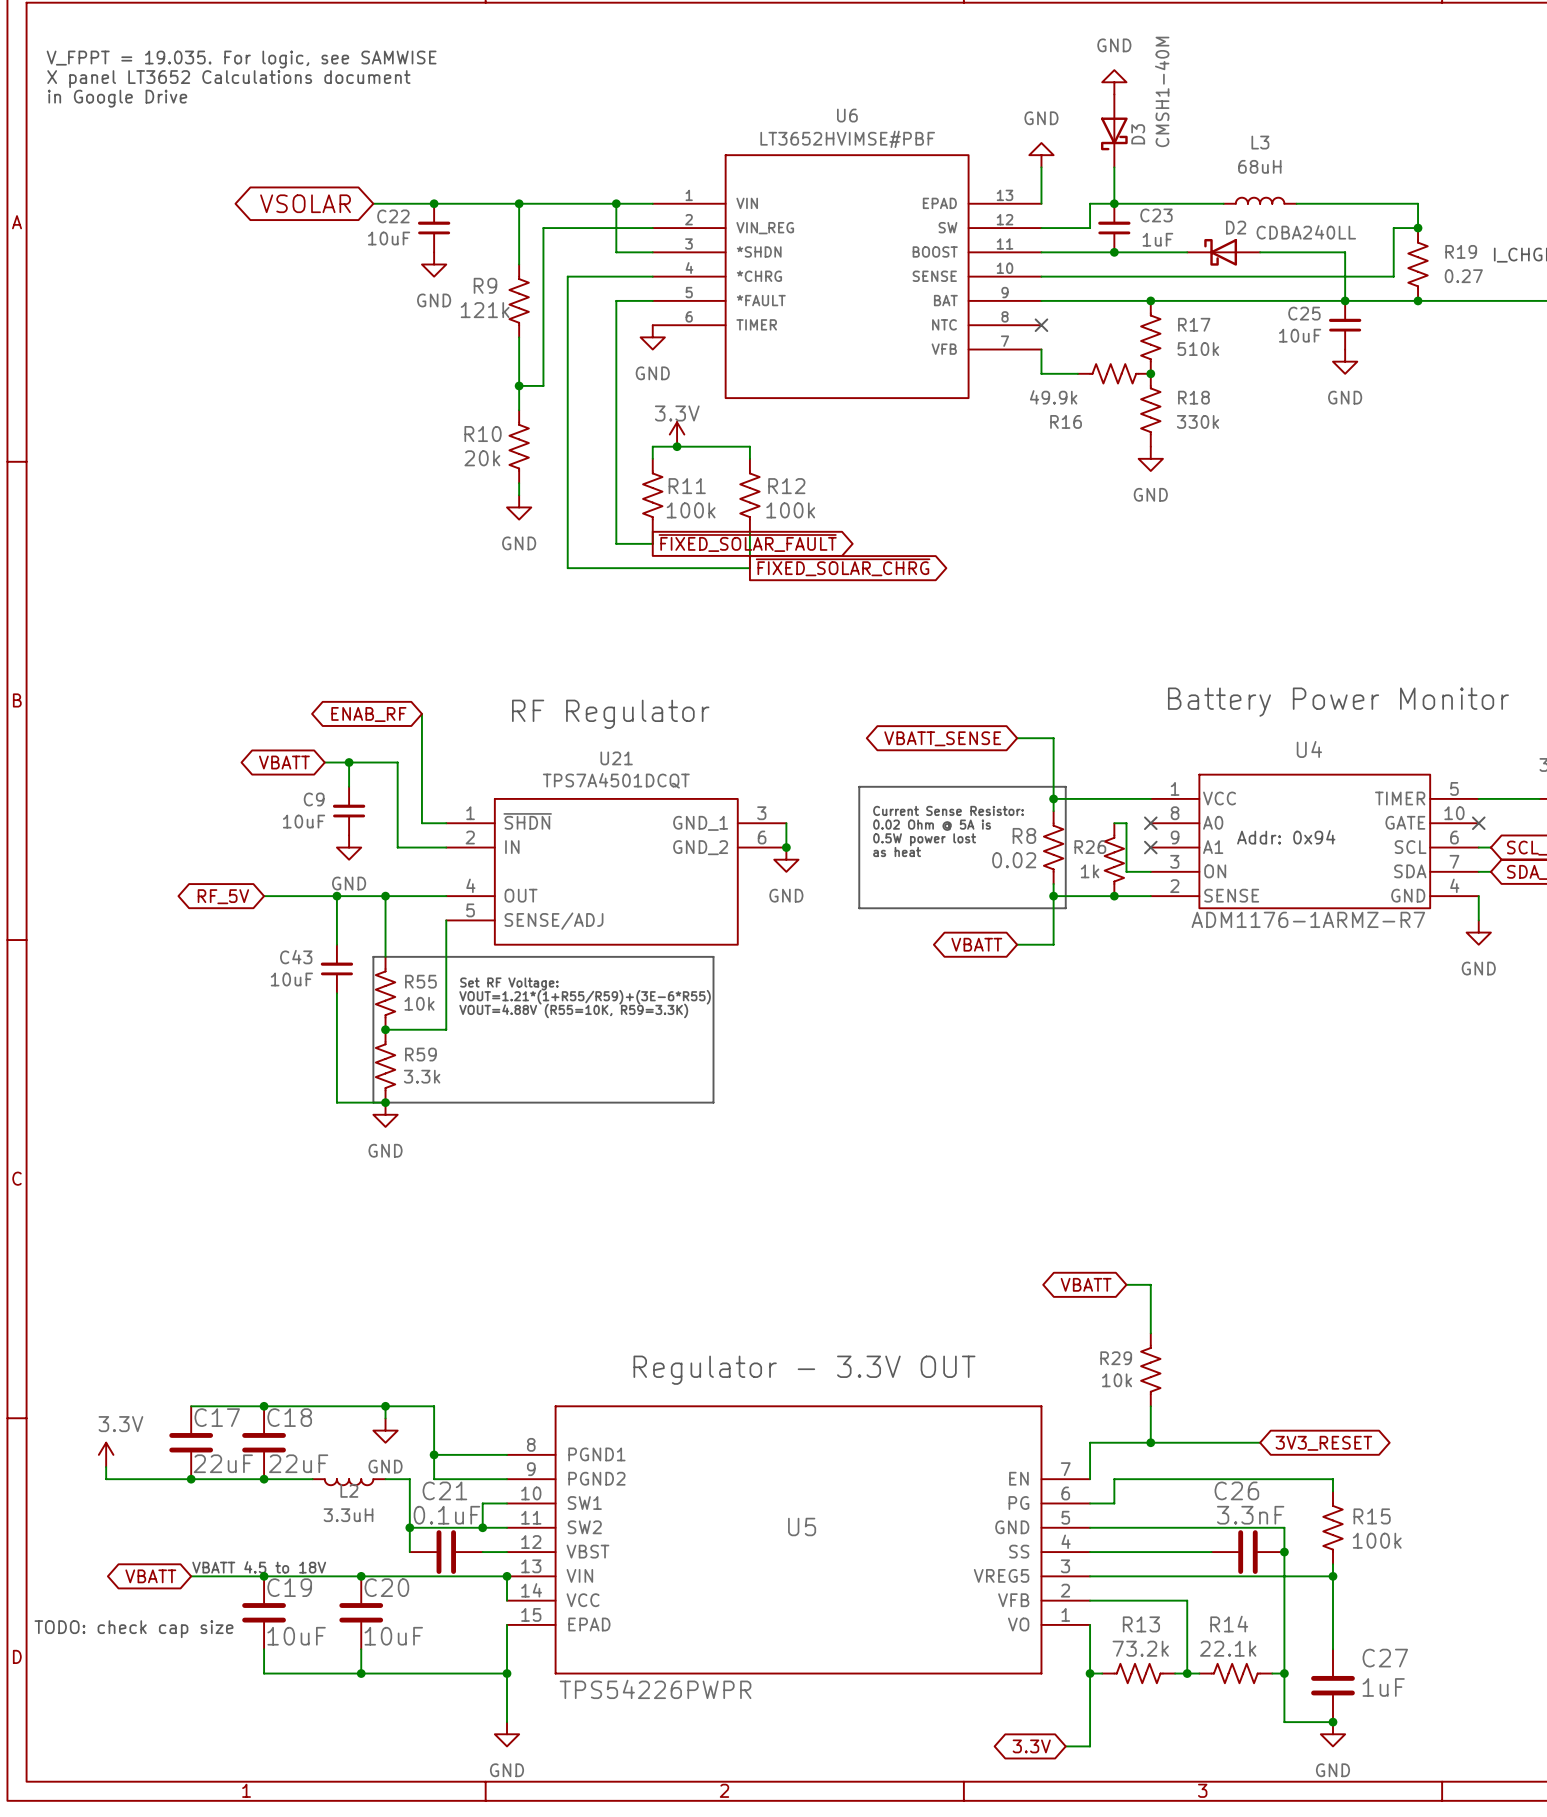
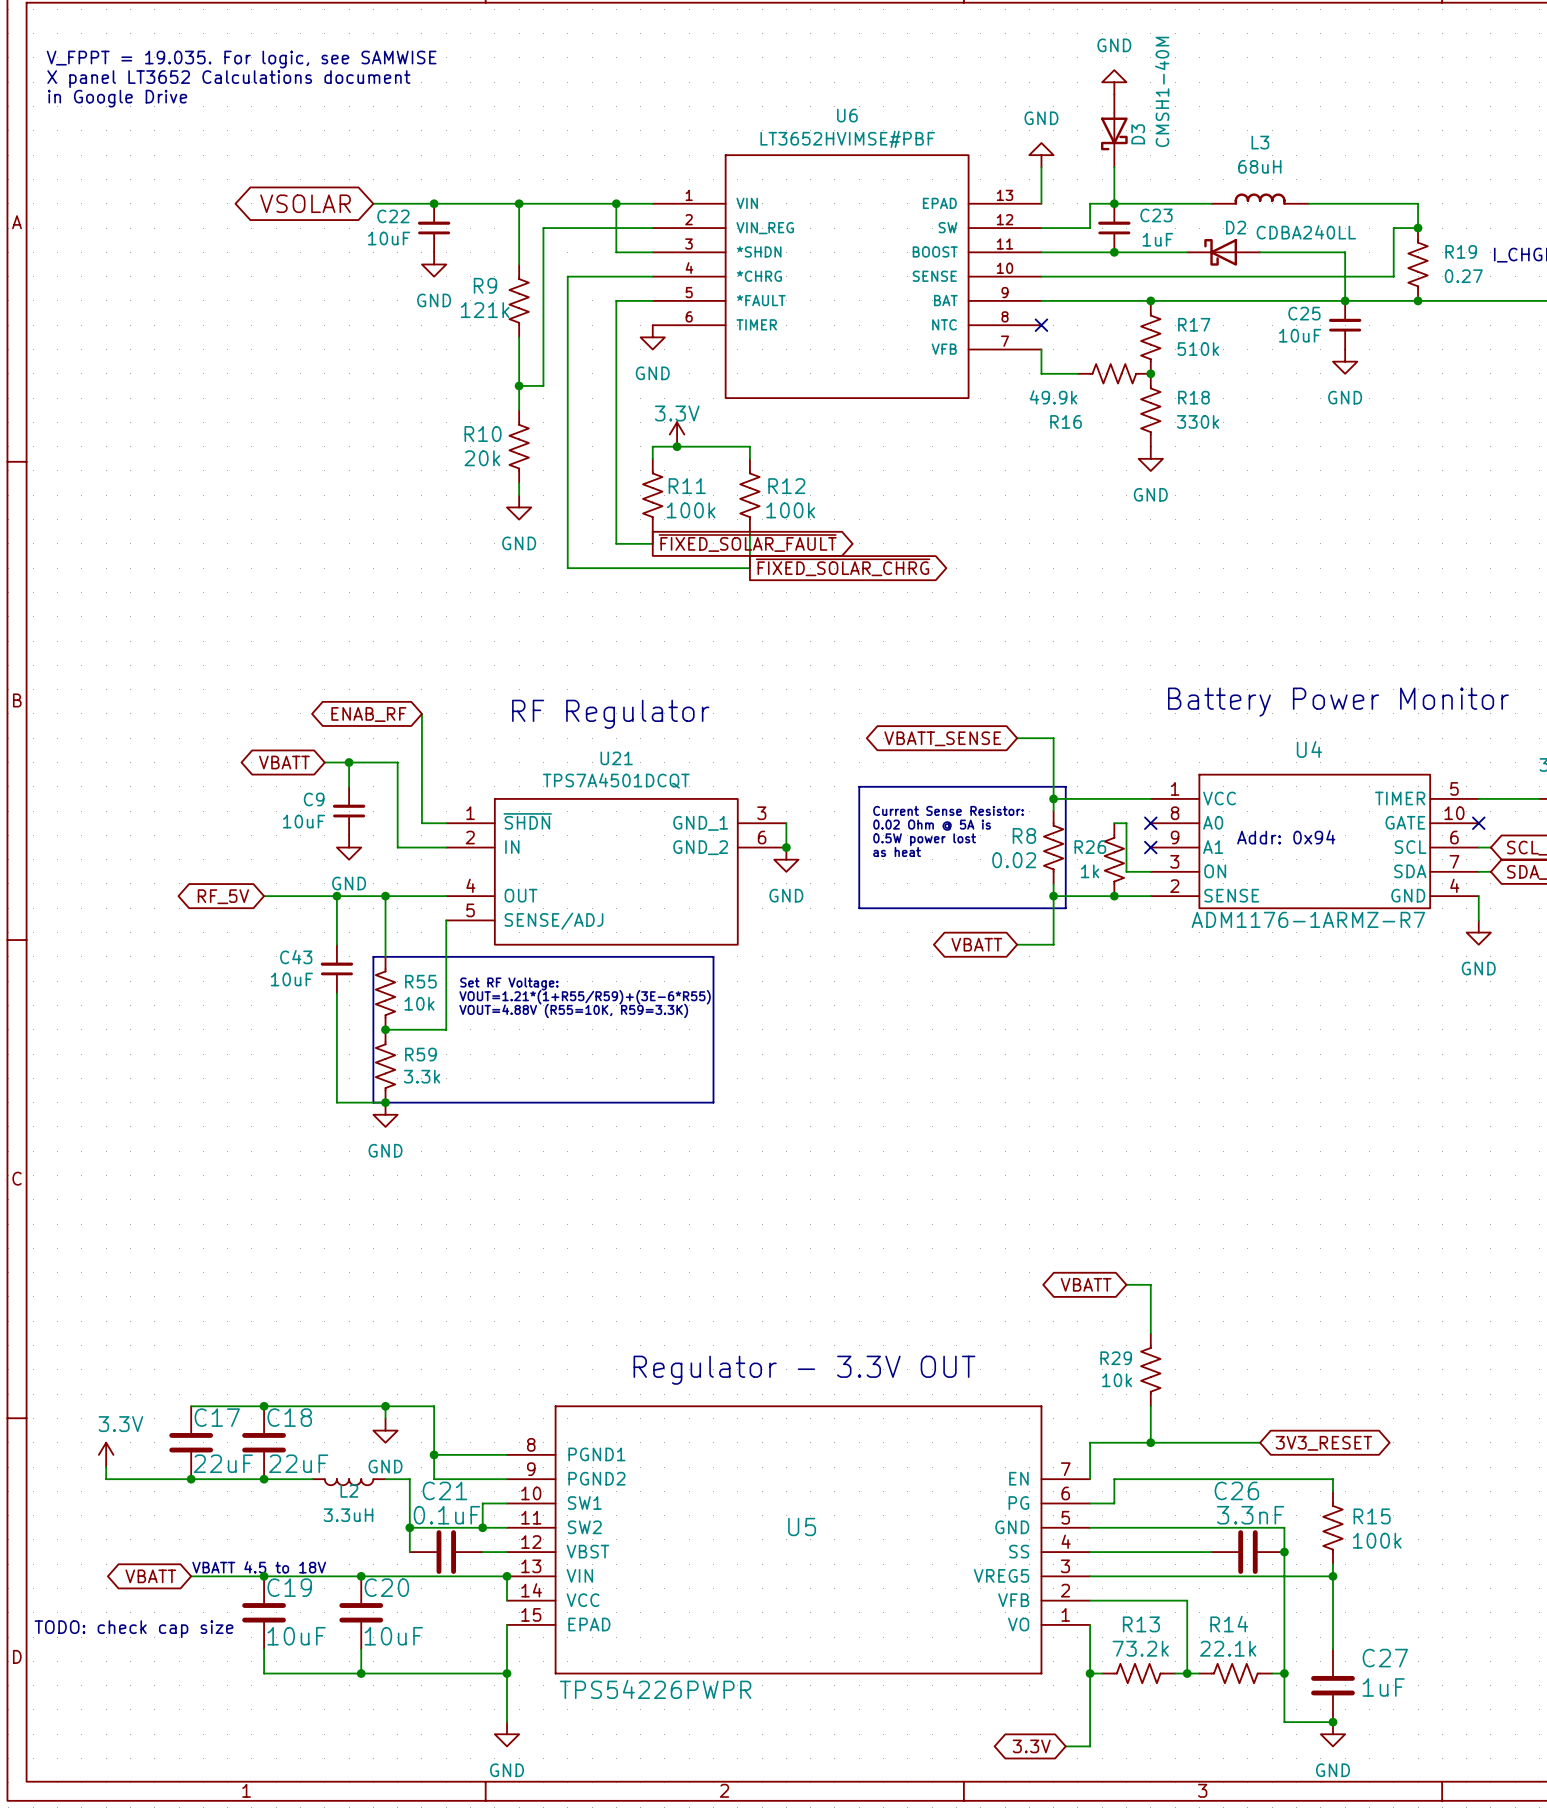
L3 symbol: [1223, 197, 1297, 204] -> [1211, 193, 1309, 205]

